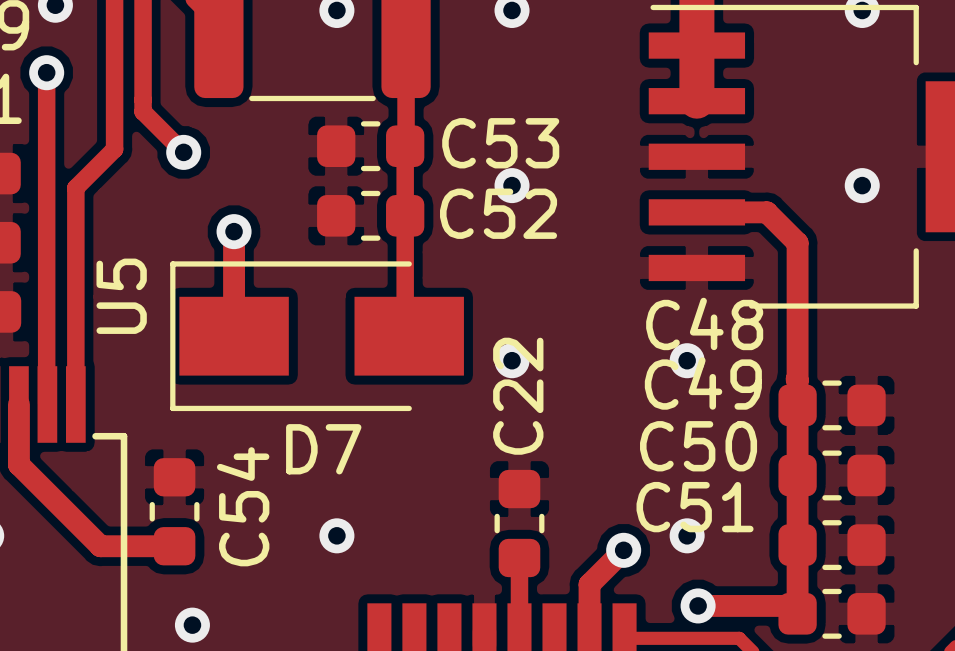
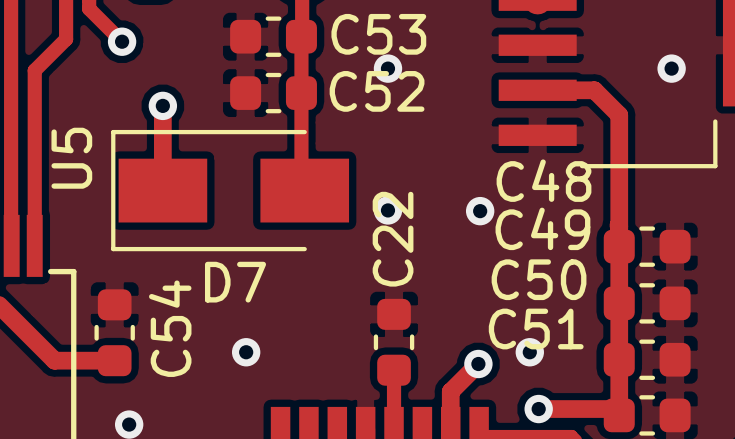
via position: (687, 360) -> (480, 211)

